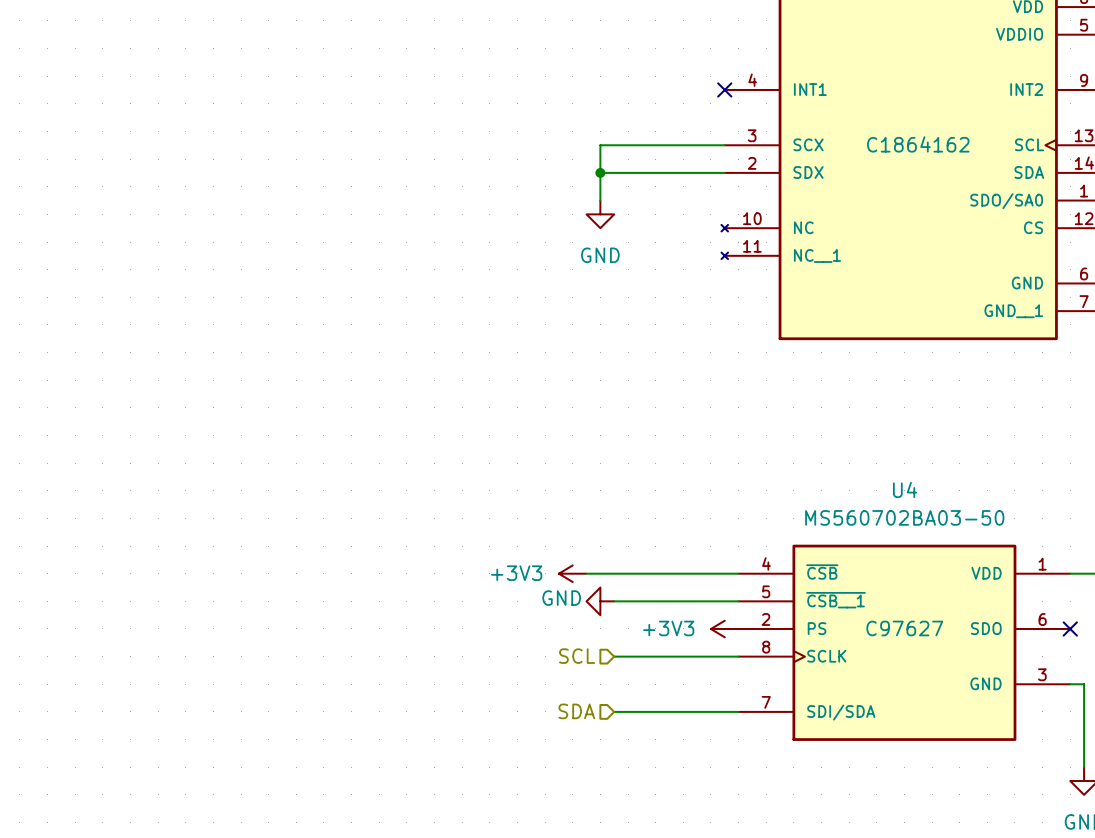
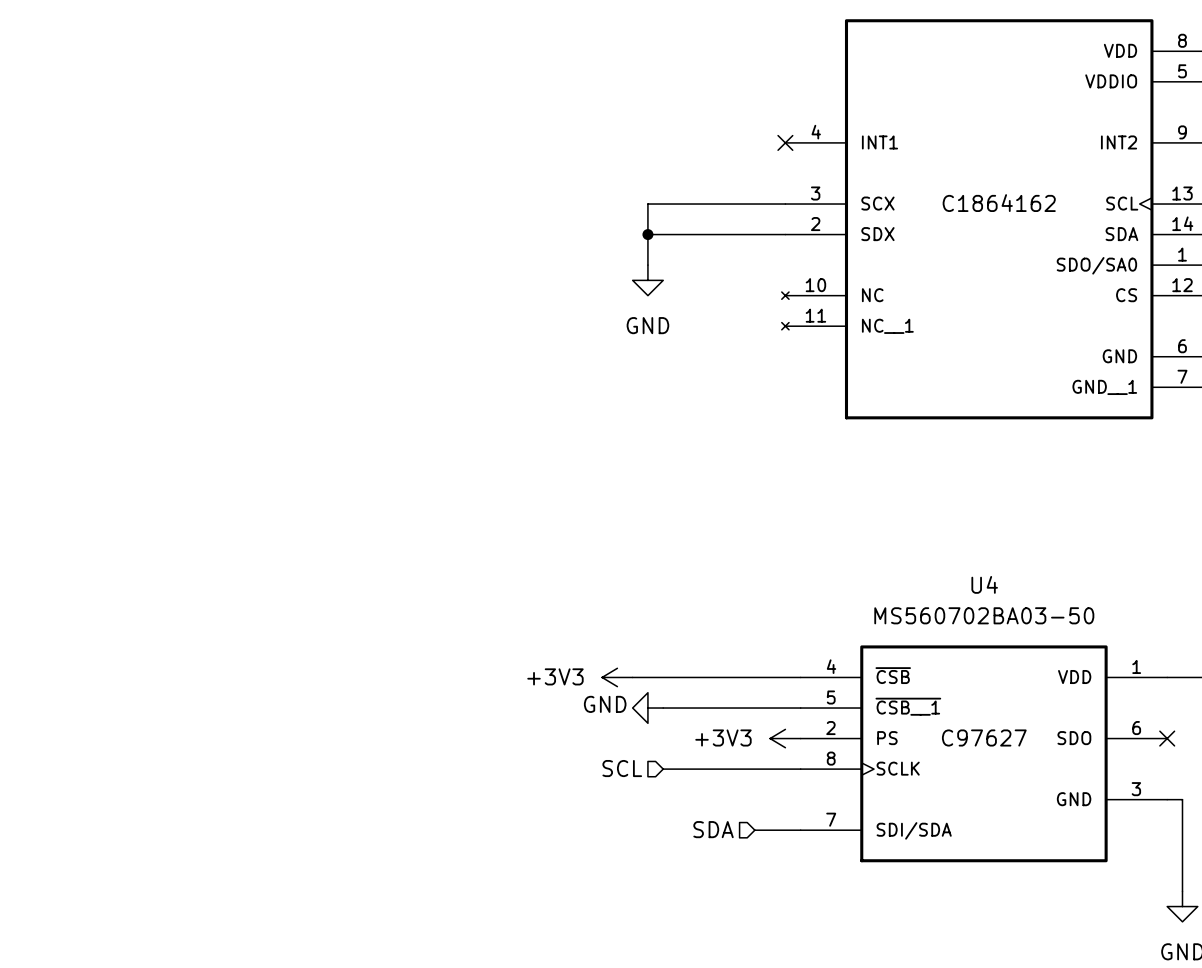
hierarchical label position: SDA (576, 711) -> SDA (713, 829)
wire: (614, 711) (697, 711) -> none

